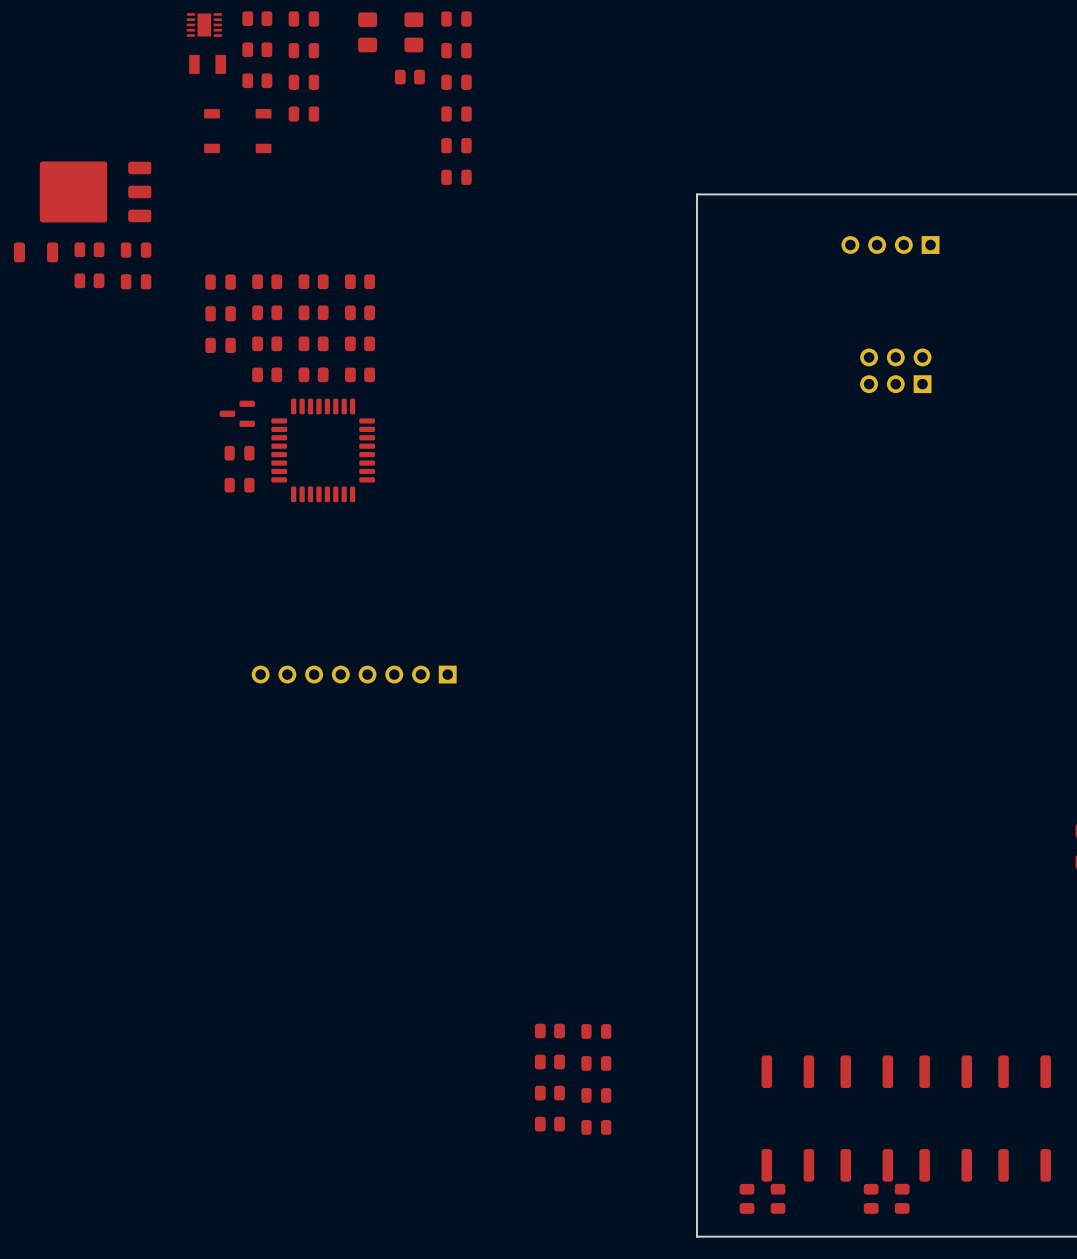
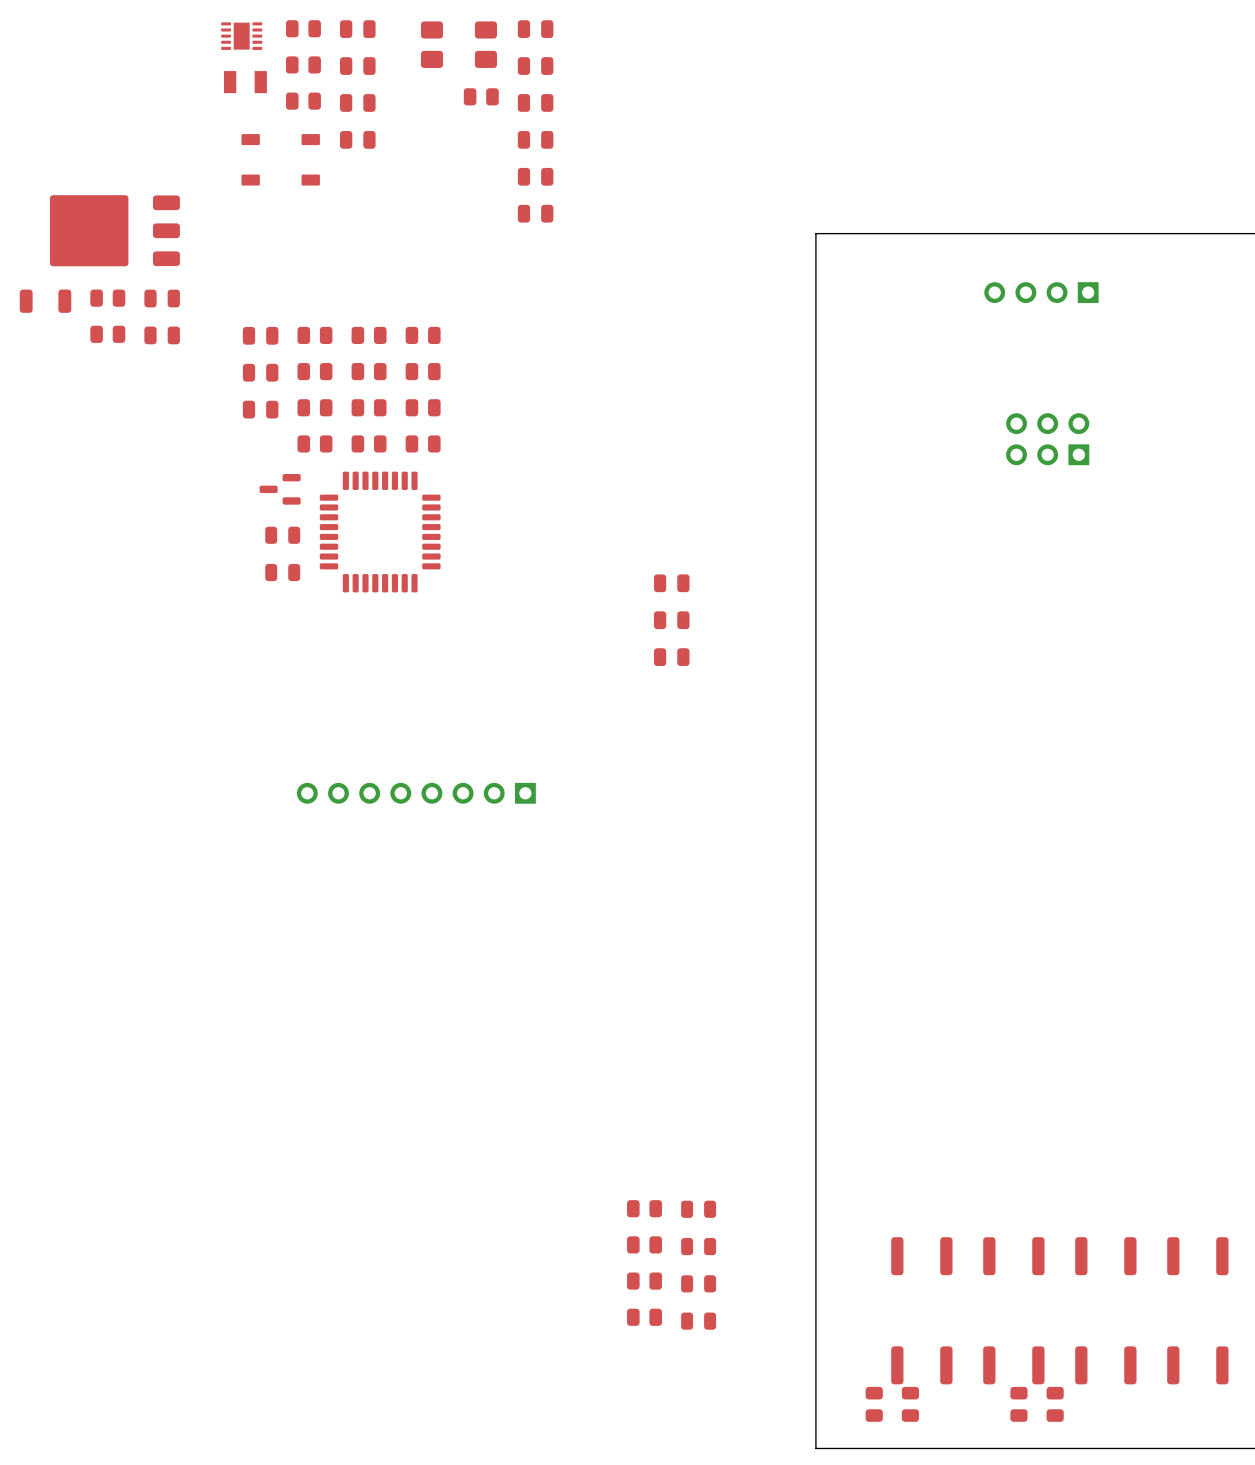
part: none -> (671, 583)
part: none -> (671, 620)
part: none -> (671, 657)

